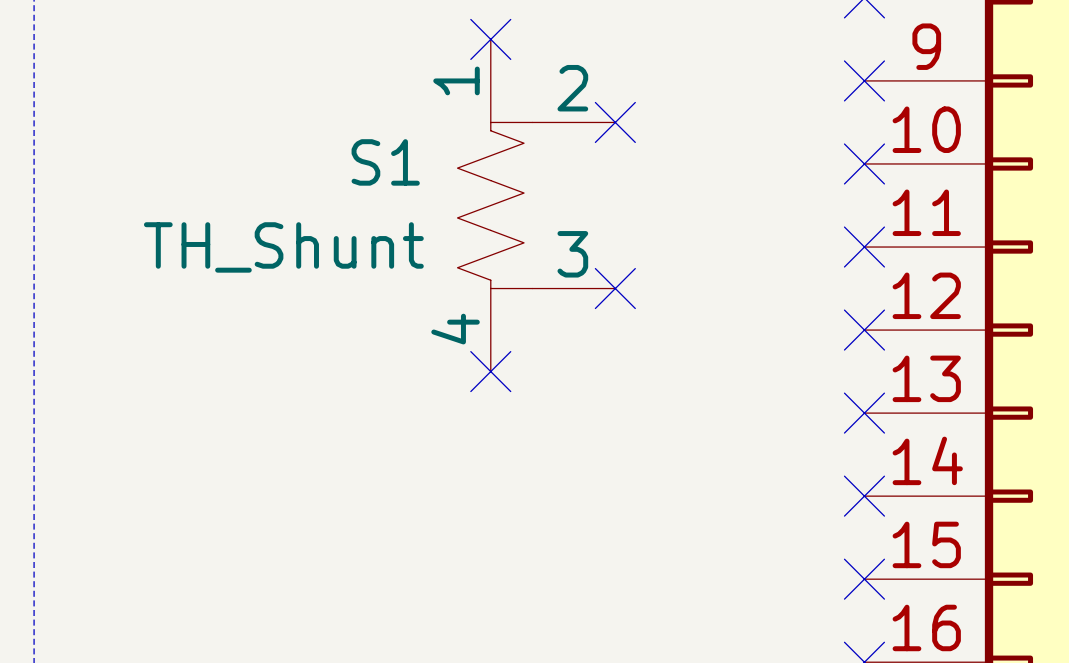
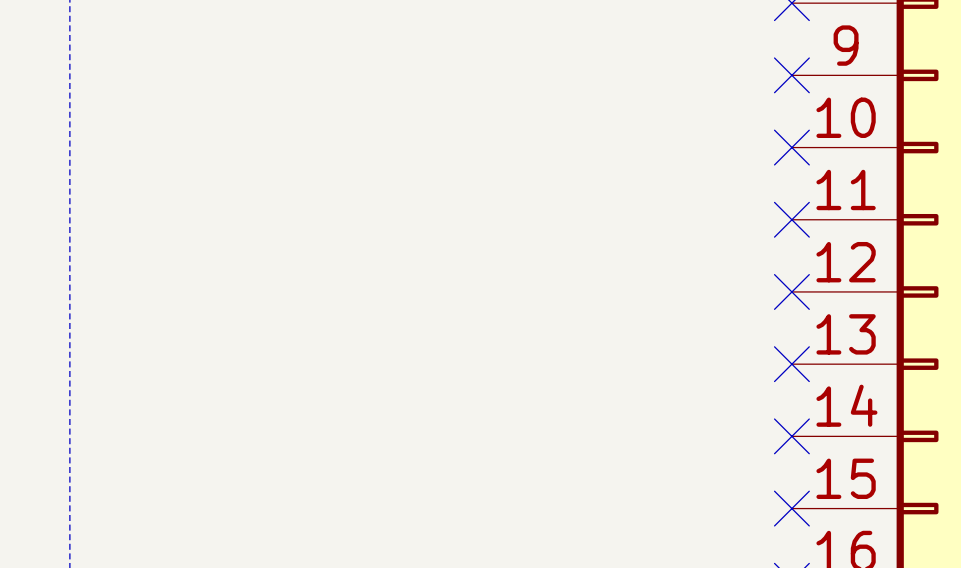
no-connect mark: (490, 39) -> none
no-connect mark: (615, 122) -> none
S1: TH_Shunt (536, 205) -> none
no-connect mark: (615, 288) -> none
no-connect mark: (490, 371) -> none

